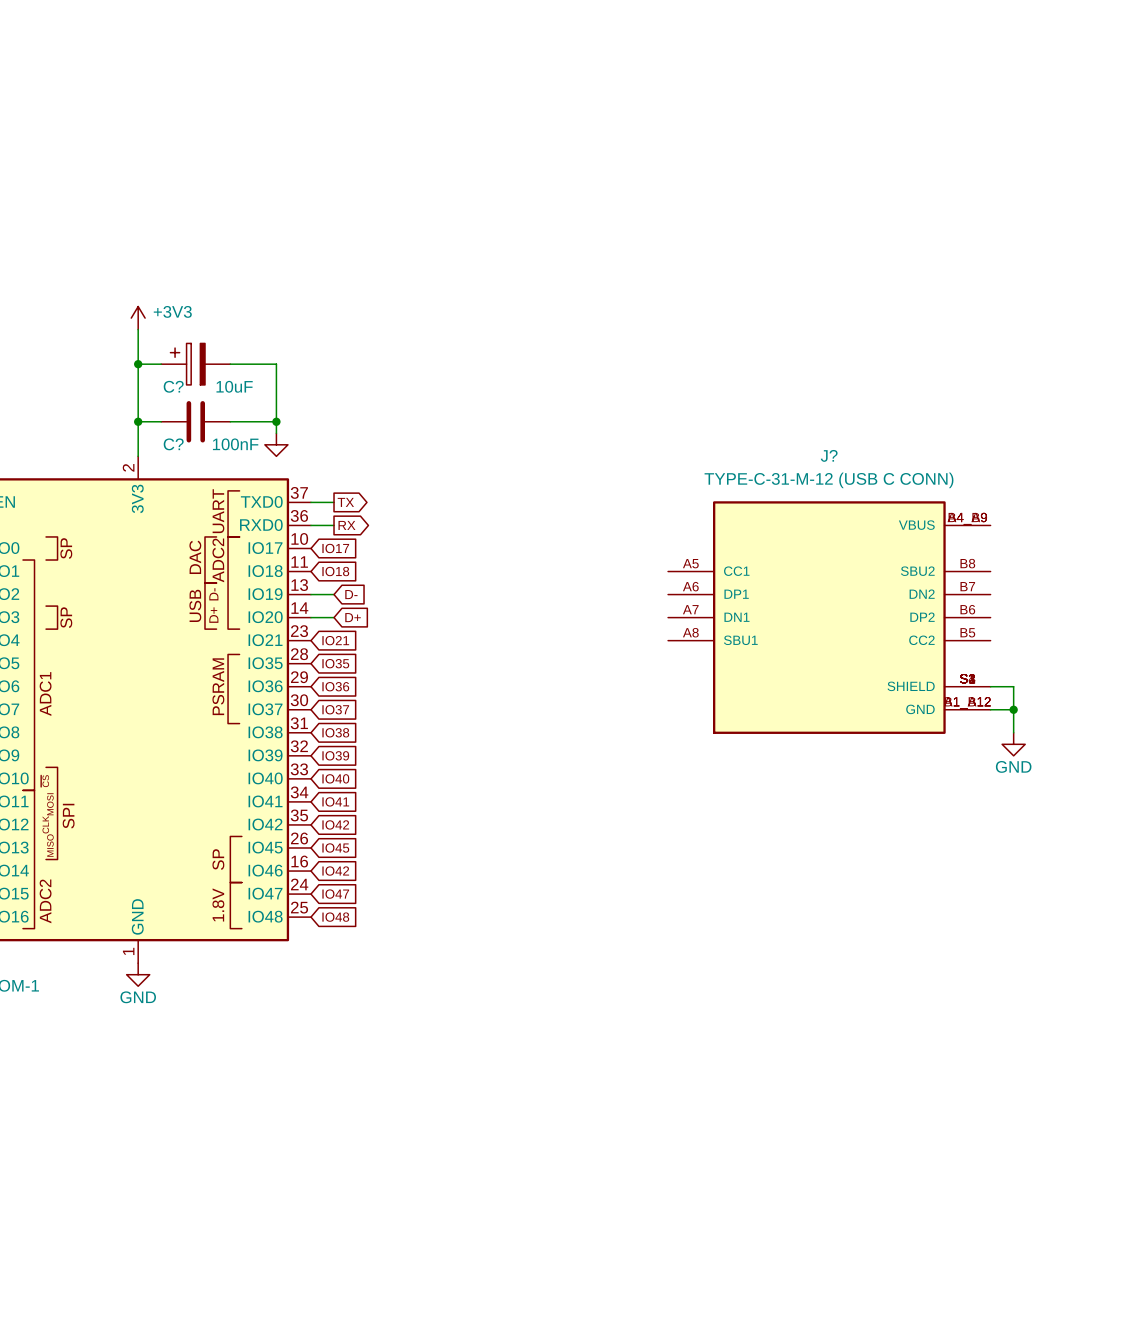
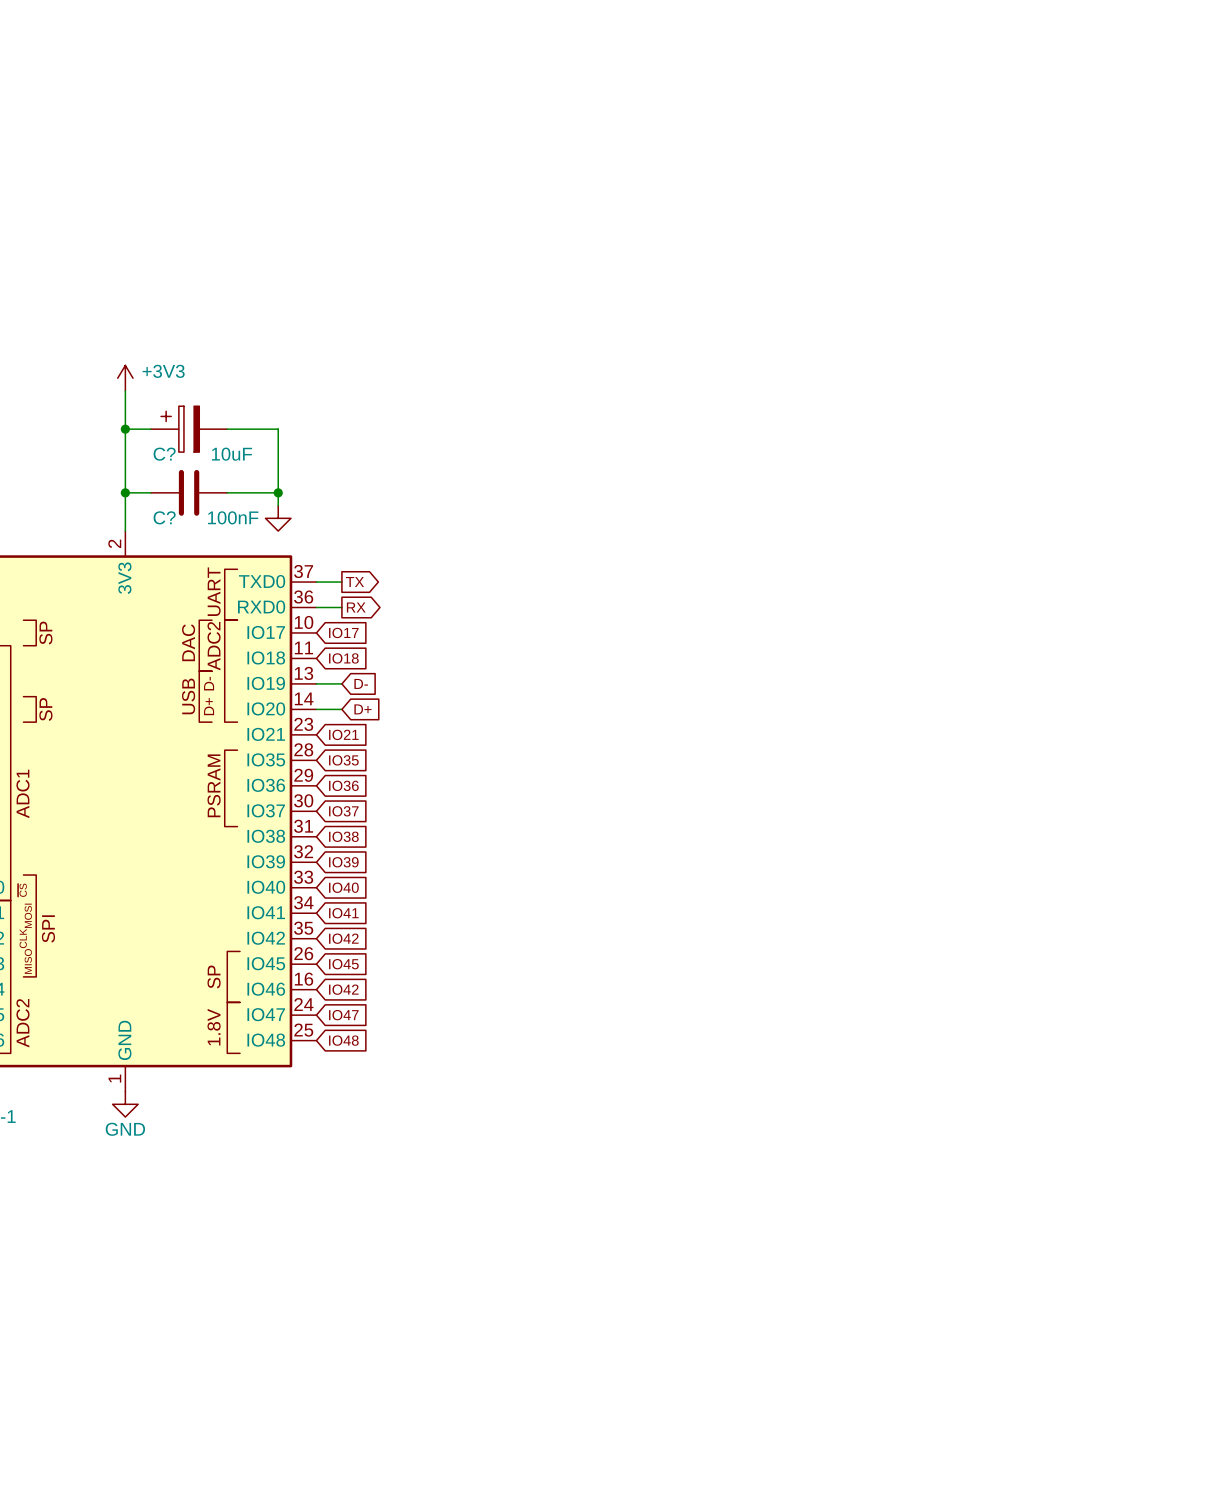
J?: TYPE-C-31-M-12 (USB C CONN) (829, 617) -> none
wire: (990, 686) (1013, 686) (1013, 732) -> none
wire: (990, 709) (1013, 709) -> none
junction: (1013, 709) -> none
power symbol: GND (1013, 744) -> none

